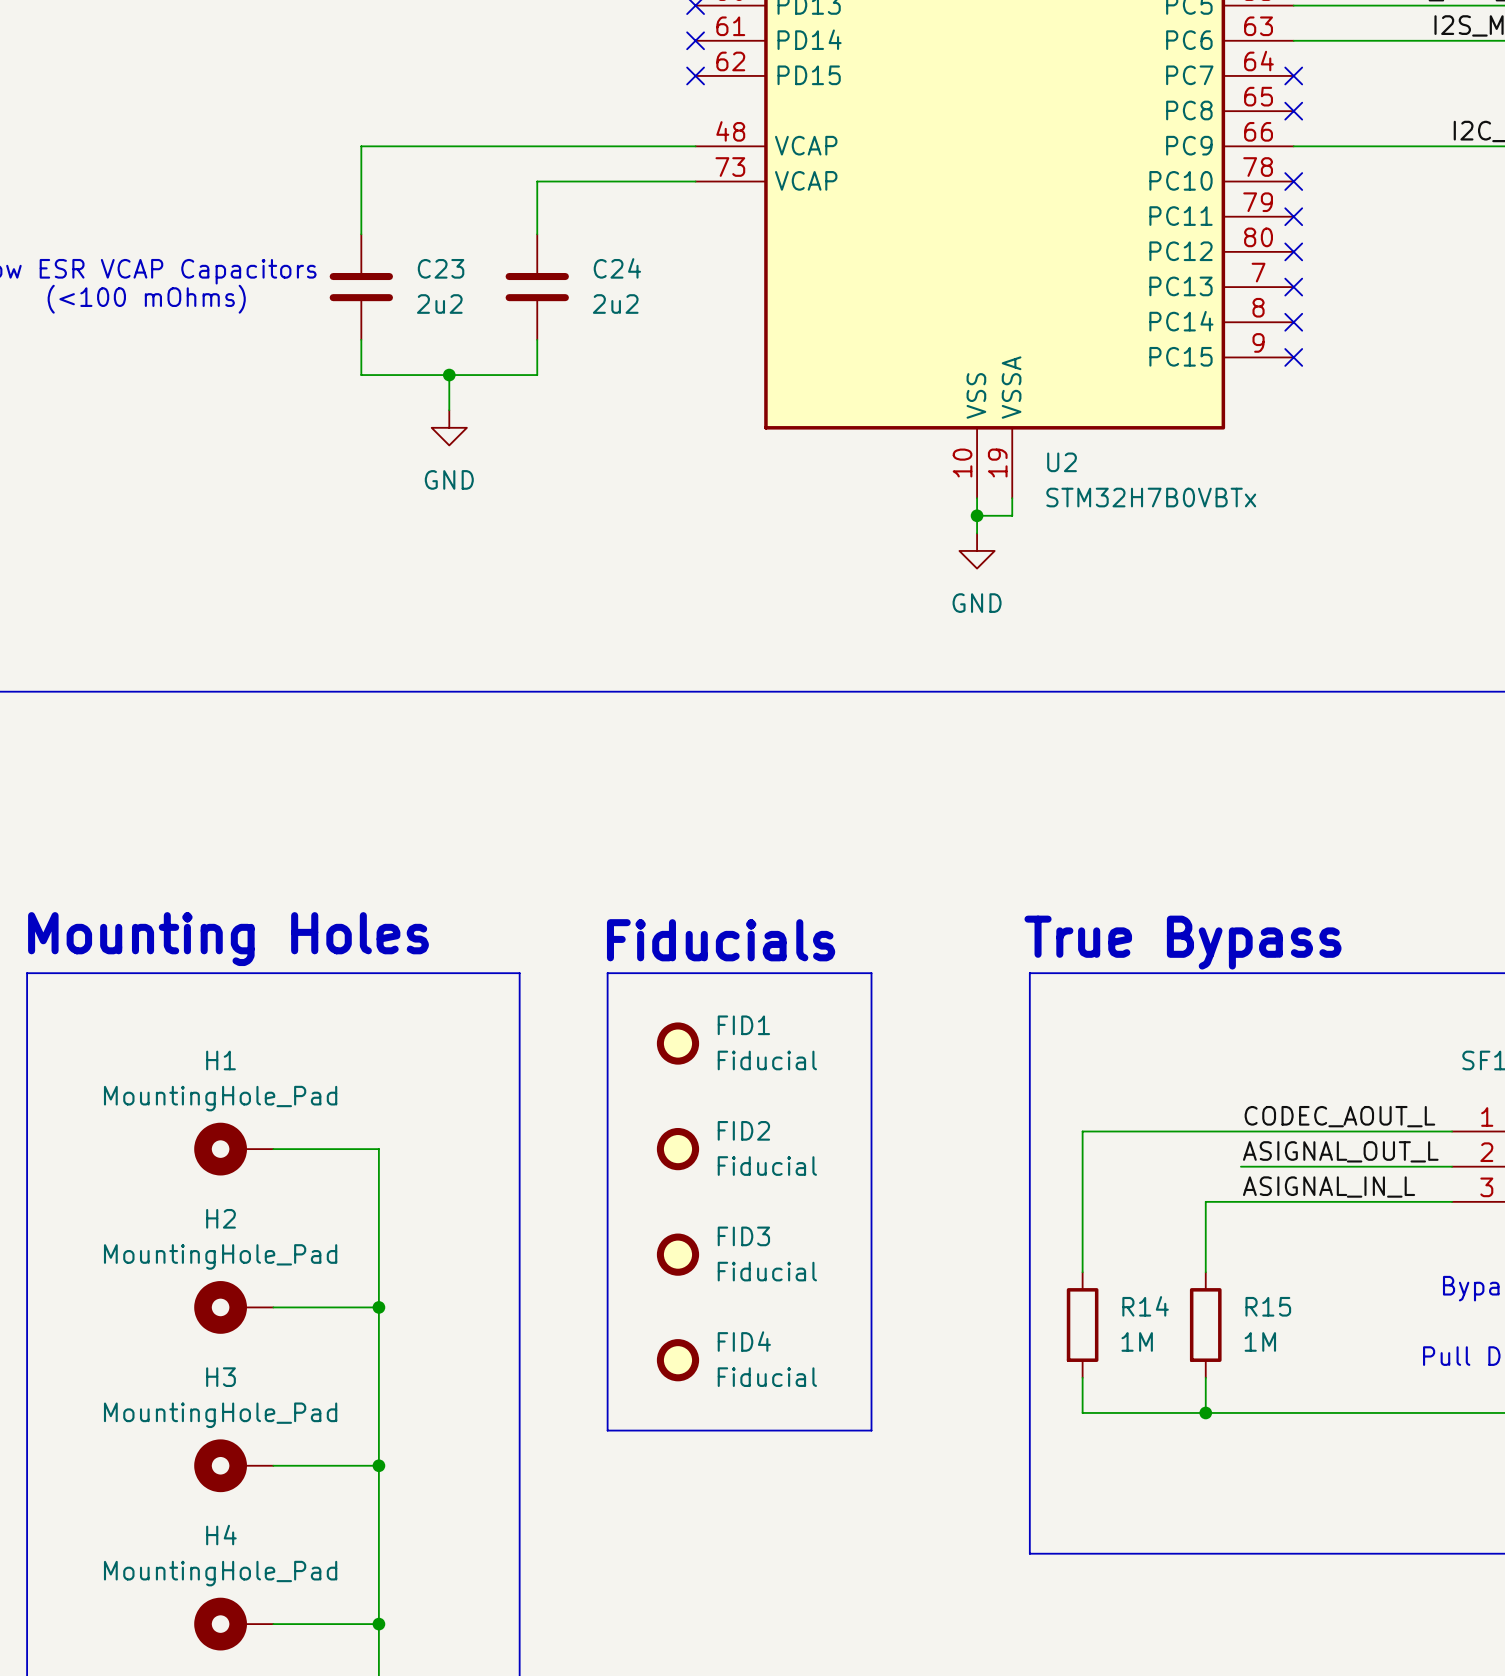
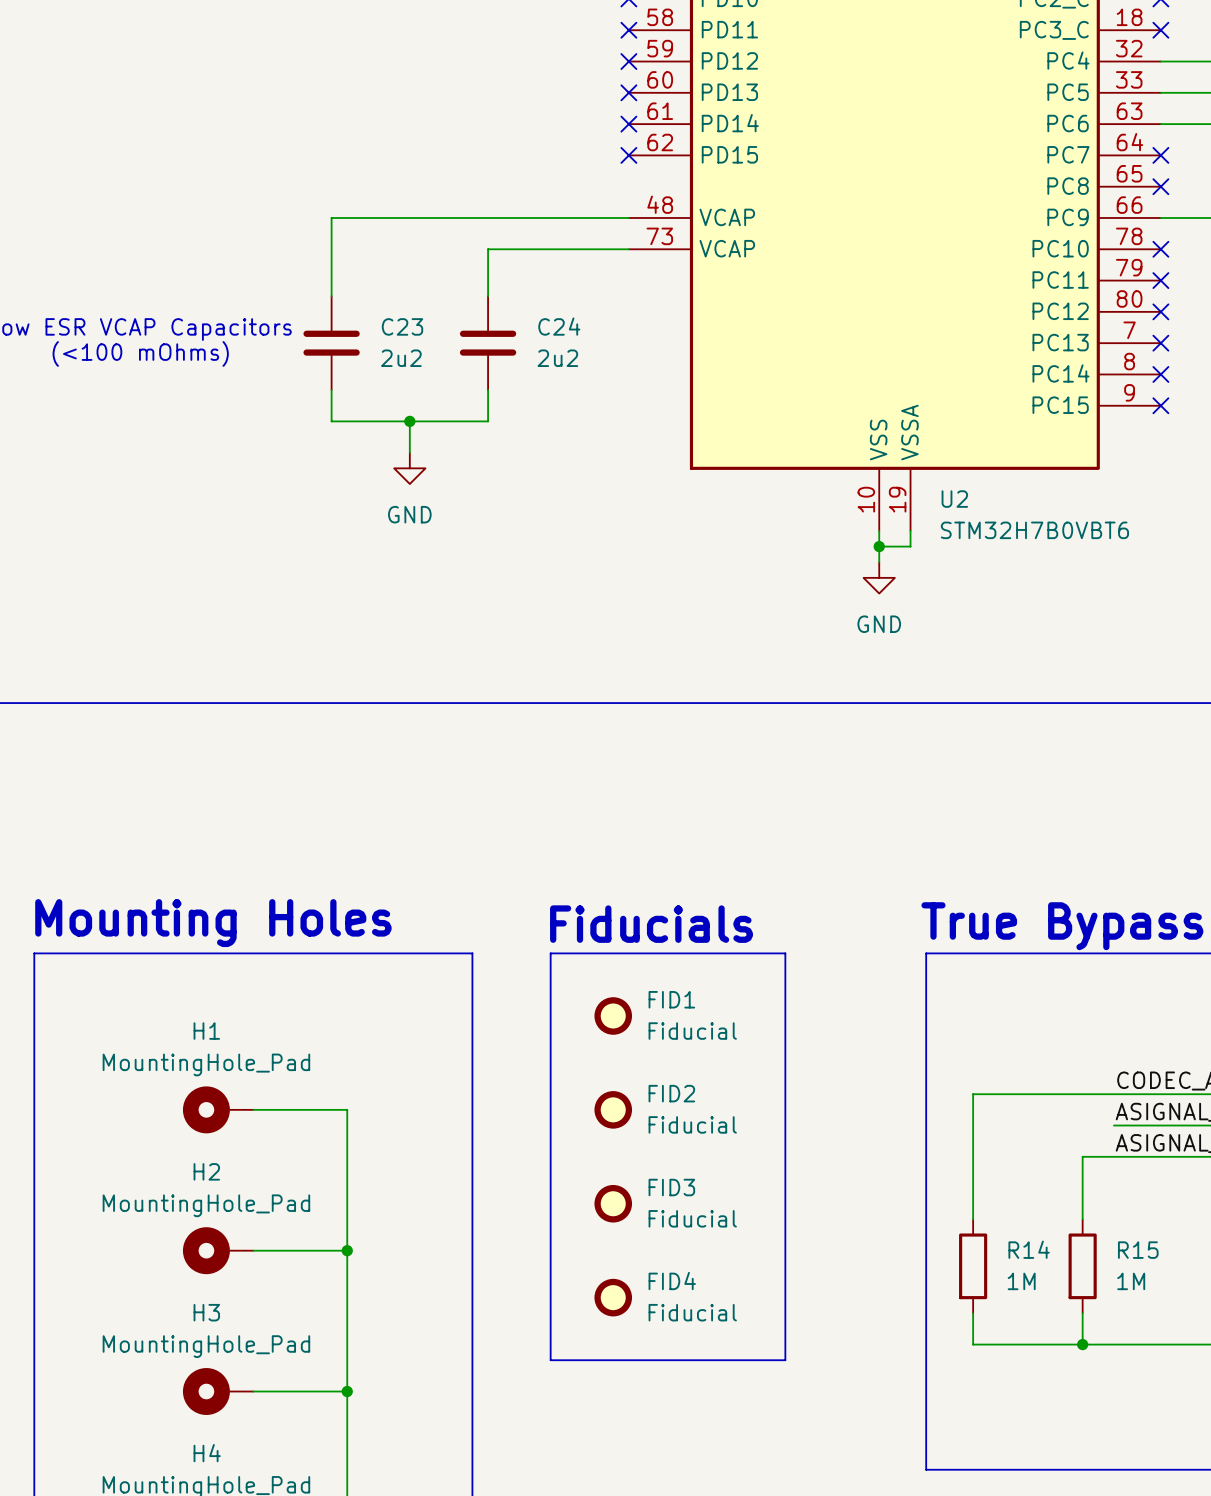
U2 value: STM32H7B0VBTx (1151, 497) -> STM32H7B0VBT6 (1034, 530)

